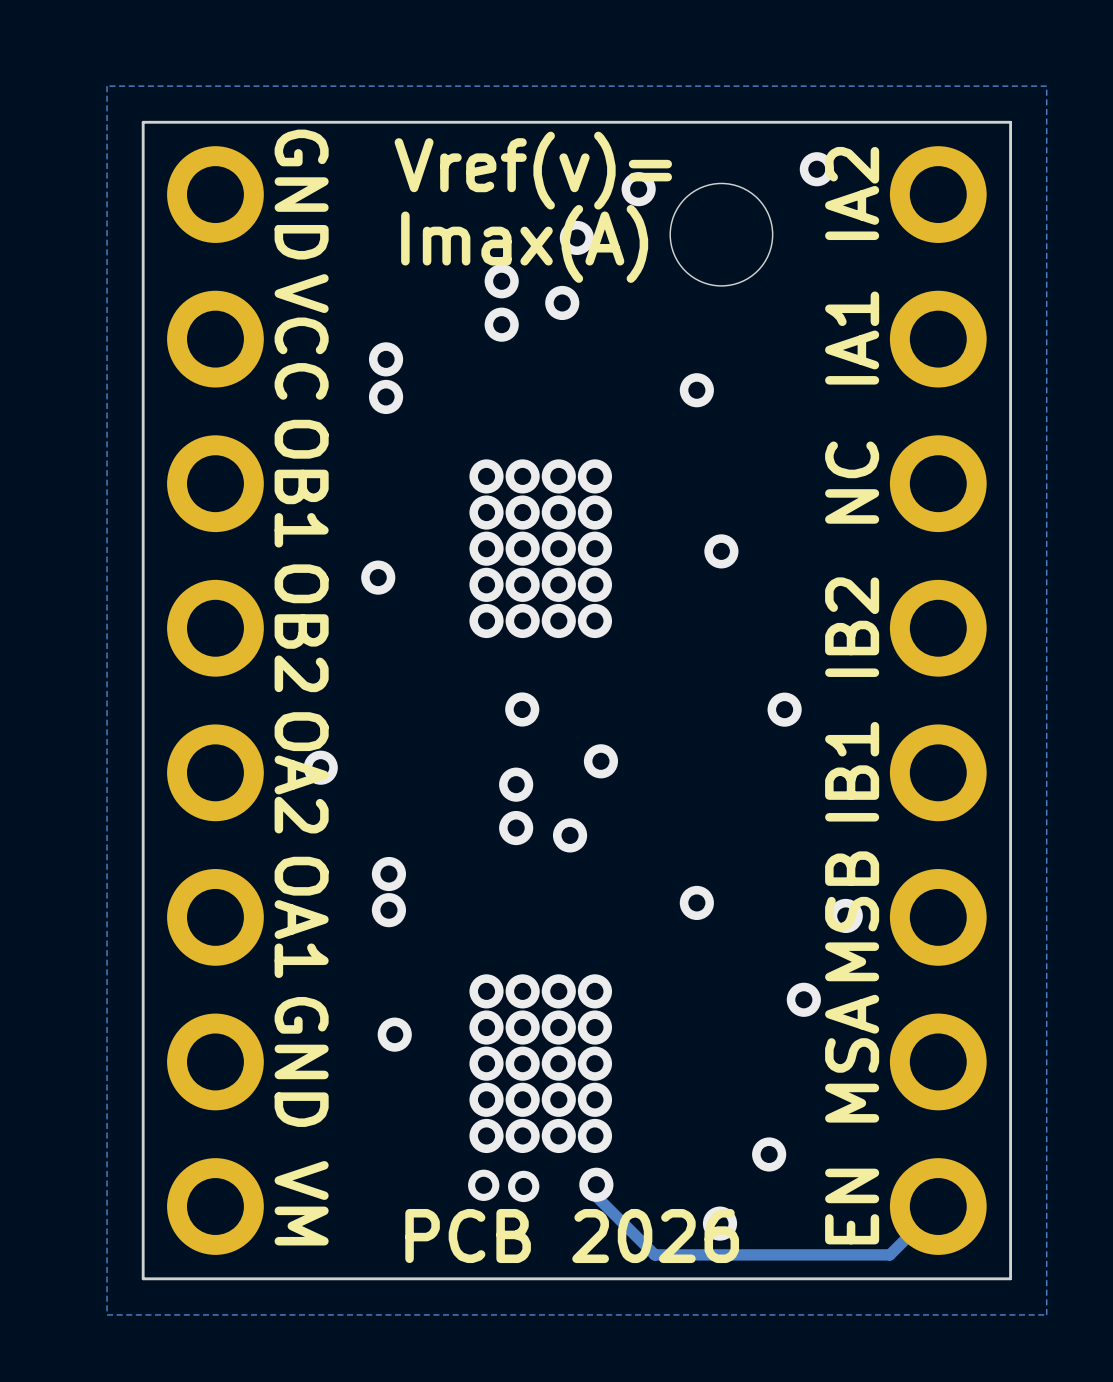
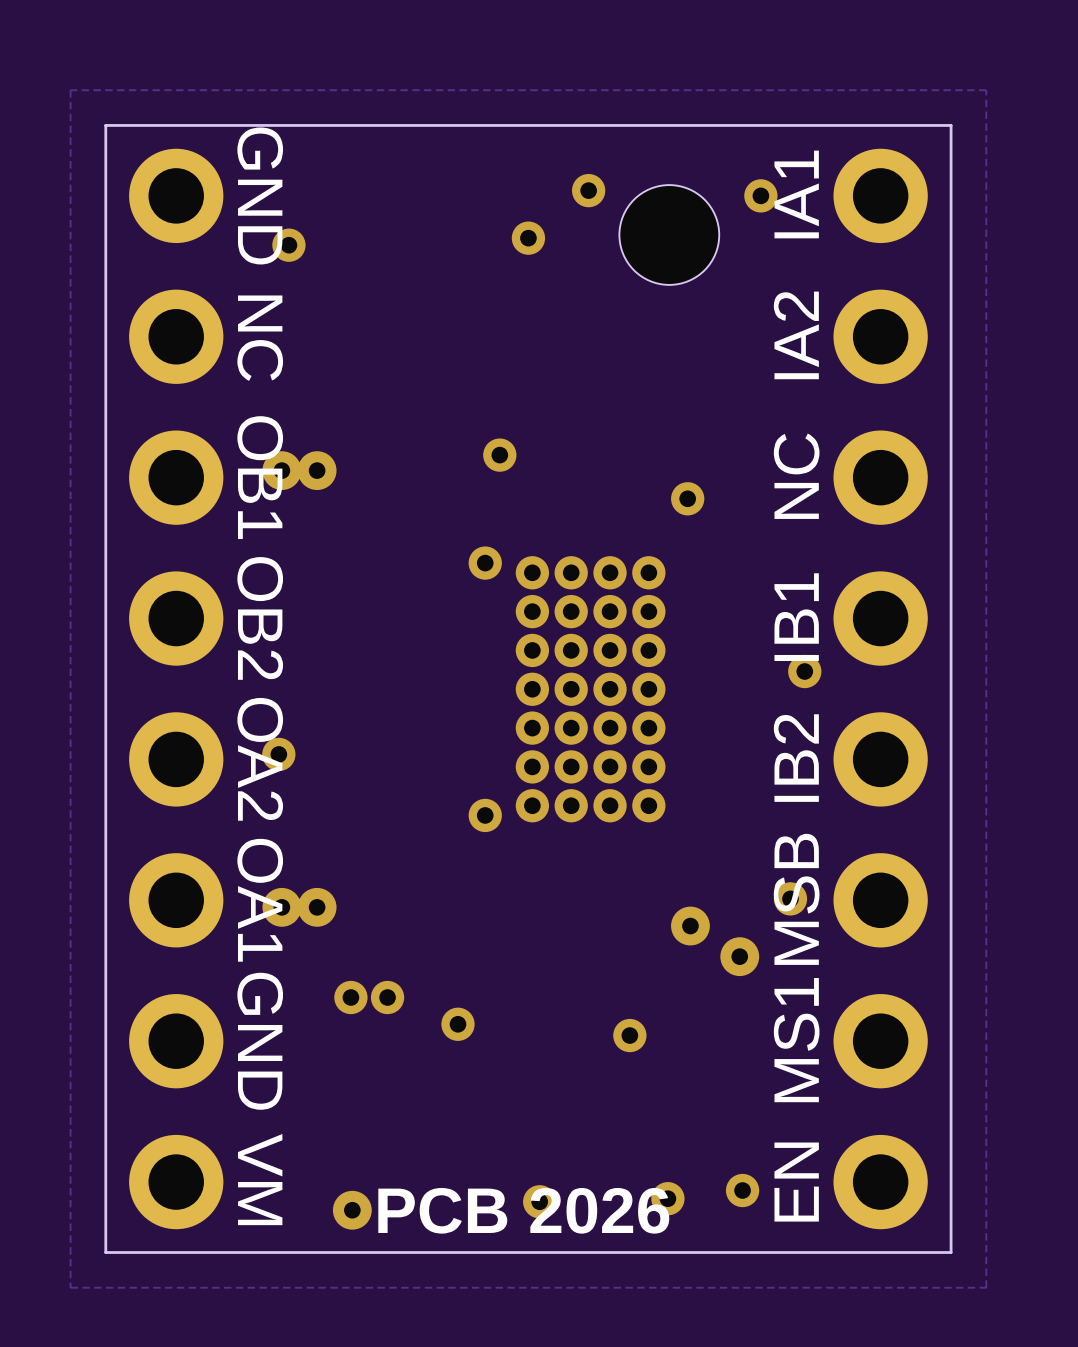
via position: (816, 169) -> (760, 195)
text: Vref(v)= (533, 170) -> none
text: IA2 (852, 193) -> IA1 (796, 194)
text: Imax(A) (524, 243) -> none
via: none -> (288, 245)
via: (501, 281) -> none
via: (562, 302) -> none
via: (501, 324) -> none
text: VCC (301, 336) -> NC (260, 338)
text: IA1 (852, 338) -> IA2 (796, 335)
via: (386, 359) -> none
via: (696, 390) -> none
via: (386, 396) -> none
via: none -> (499, 455)
via: none -> (281, 470)
via: none -> (317, 470)
via: (486, 476) -> none
via: (522, 476) -> none
via: (558, 476) -> none
via: (594, 476) -> none
via: none -> (687, 498)
via: (486, 512) -> none
via: (522, 512) -> none
via: (558, 512) -> none
via: (594, 512) -> none
via: (486, 548) -> none
via: (522, 548) -> none
via: (558, 548) -> none
via: (594, 548) -> none
via position: (721, 551) -> (648, 572)
via: none -> (485, 563)
via: (378, 577) -> none
via: none -> (532, 572)
via: none -> (571, 572)
via: none -> (610, 572)
via: (486, 584) -> none
via: (522, 584) -> none
via: (558, 584) -> none
via: (594, 584) -> none
via: (486, 620) -> none
via: (522, 620) -> none
via: (558, 620) -> none
via: (594, 620) -> none
via: none -> (532, 611)
via: none -> (571, 611)
via: none -> (610, 611)
via: none -> (648, 611)
text: IB2 (852, 627) -> IB1 (796, 617)
via: none -> (532, 650)
via: none -> (571, 650)
via: none -> (610, 650)
via: none -> (648, 650)
via: none -> (804, 671)
via: none -> (532, 689)
via: none -> (571, 689)
via: none -> (610, 689)
via: none -> (648, 689)
via: (522, 709) -> none
via: (784, 709) -> none
via: none -> (532, 728)
via: none -> (571, 728)
via: none -> (610, 728)
via: none -> (648, 728)
via: (600, 761) -> none
text: IB1 (852, 771) -> IB2 (796, 758)
via: none -> (532, 766)
via: none -> (571, 766)
via: none -> (610, 766)
via: none -> (648, 766)
via: (516, 784) -> none
via: none -> (571, 805)
via: none -> (610, 805)
via: none -> (648, 805)
via position: (516, 828) -> (485, 815)
via position: (570, 835) -> (532, 805)
via: (388, 874) -> none
via: (696, 902) -> none
via position: (388, 910) -> (317, 907)
via: none -> (281, 907)
via: none -> (690, 926)
via: (486, 991) -> none
via: (522, 991) -> none
via: (558, 991) -> none
via: (594, 991) -> none
via position: (803, 999) -> (739, 956)
via: none -> (387, 997)
via: (486, 1027) -> none
via: (522, 1027) -> none
via: (558, 1027) -> none
via: (594, 1027) -> none
via position: (394, 1034) -> (350, 997)
via: none -> (457, 1024)
via: none -> (629, 1035)
text: MSA (852, 1058) -> MS1 (796, 1040)
via: (486, 1063) -> none
via: (522, 1063) -> none
via: (558, 1063) -> none
via: (594, 1063) -> none
via: (486, 1099) -> none
via: (522, 1099) -> none
via: (558, 1099) -> none
via: (594, 1099) -> none
via: (486, 1135) -> none
via: (522, 1135) -> none
via: (558, 1135) -> none
via: (594, 1135) -> none
via: (769, 1154) -> none
track: (596, 1184) (596, 1196) (654, 1254) (889, 1254) (938, 1206) -> none
via position: (596, 1184) -> (539, 1201)
via: (483, 1185) -> none
via: (523, 1186) -> none
via: none -> (742, 1190)
via: none -> (352, 1210)

